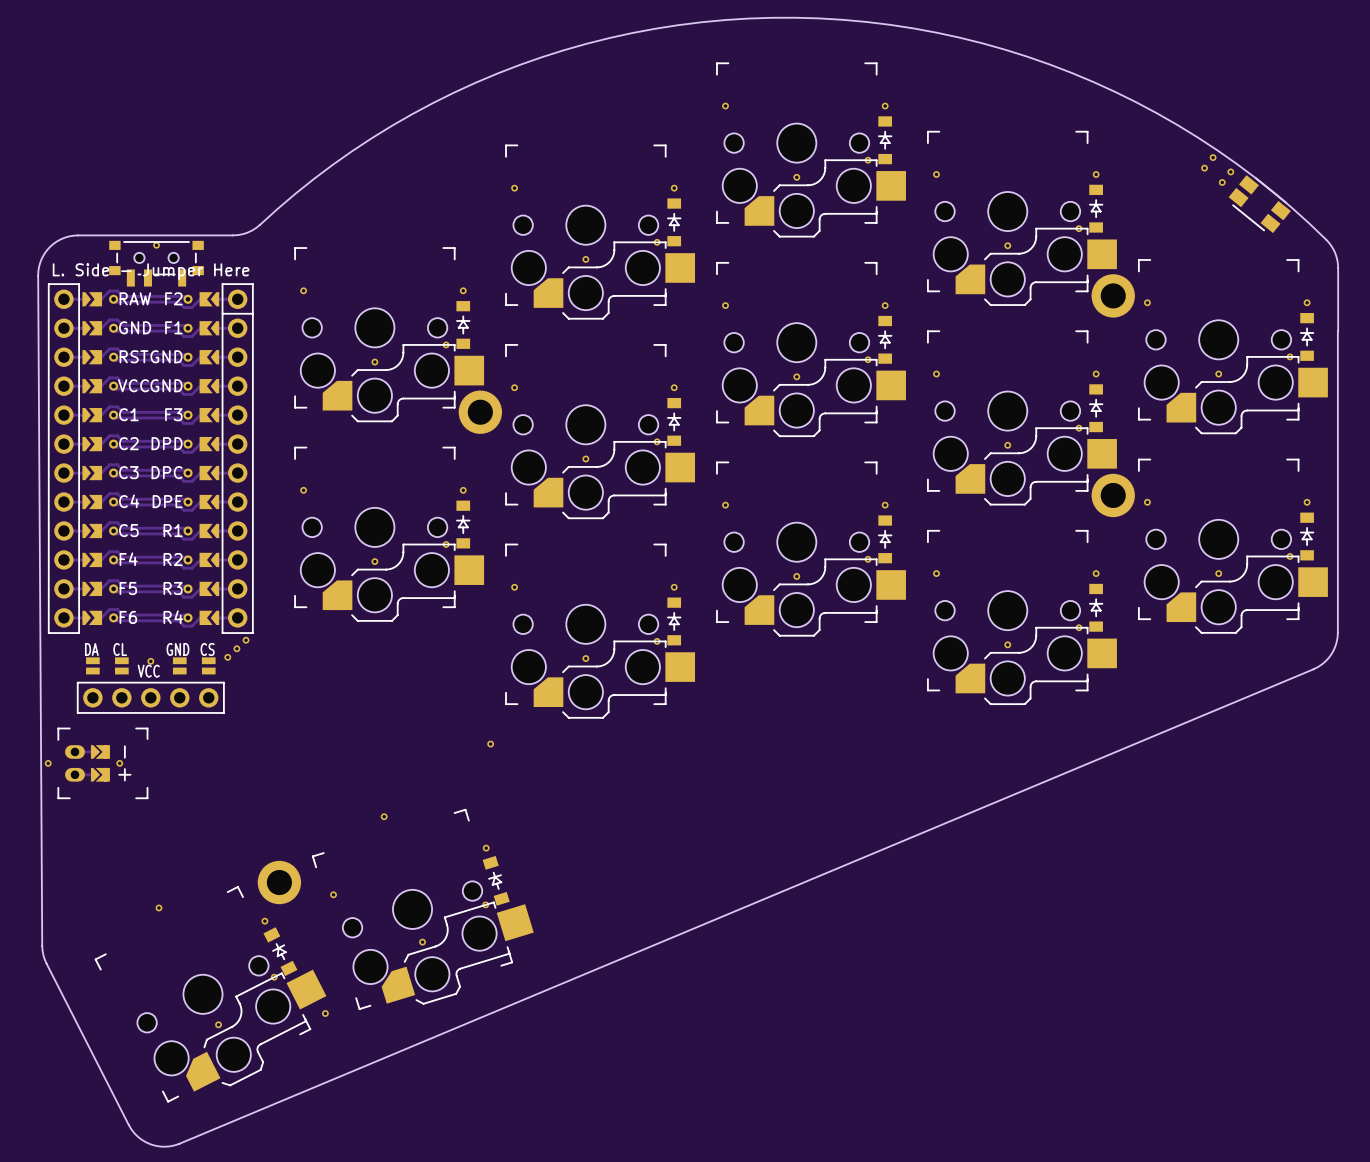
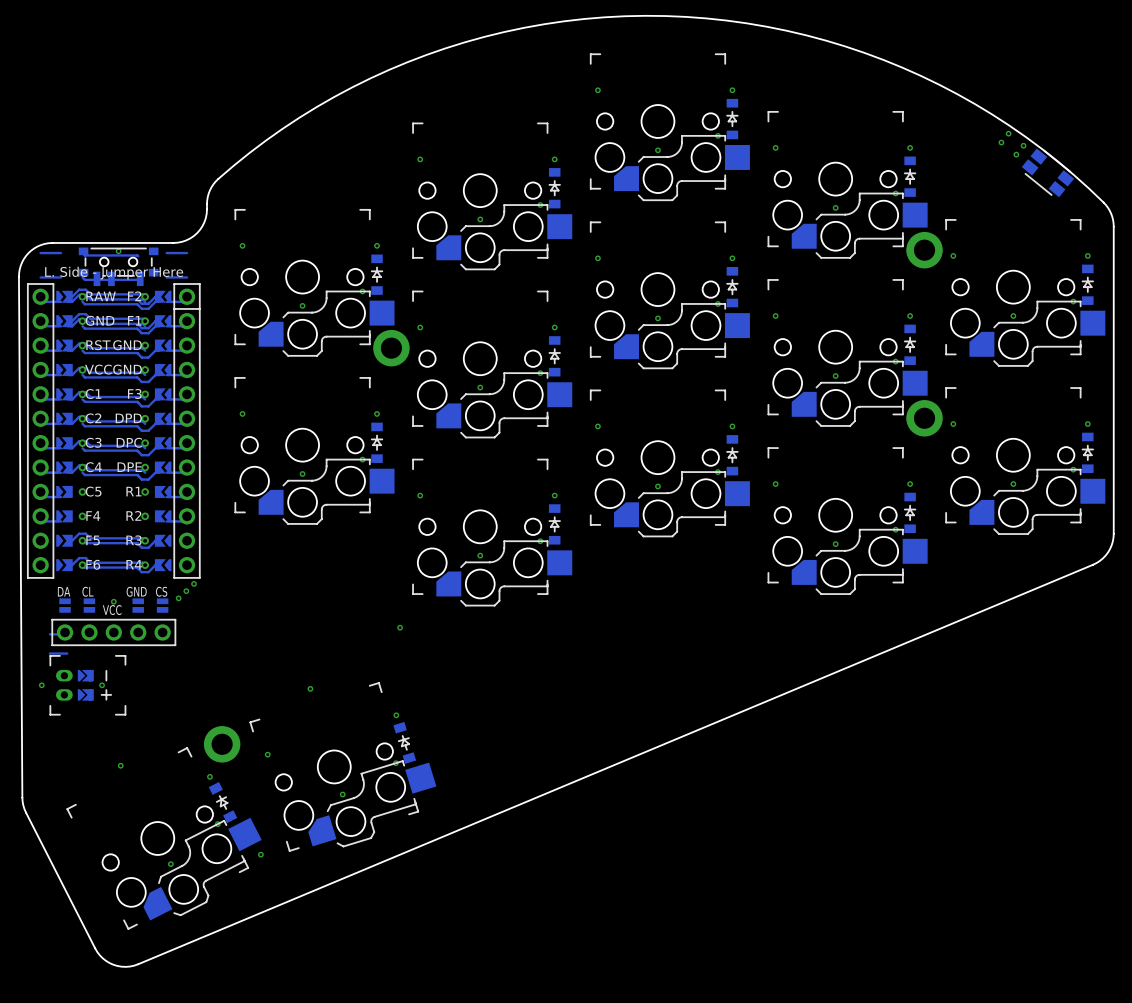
board edge: (78, 235) (64, 237) (49, 247) (42, 258) (38, 271) (42, 945) -> none
board edge: (232, 235) (247, 232) (256, 227) (314, 178) (391, 125) (454, 92) (519, 65) (586, 43) (678, 25) (749, 18) (843, 19) (936, 32) (1027, 56) (1115, 91) (1197, 137) (1273, 192) (1331, 245) (1337, 264) (1337, 331) -> (22, 797) (18, 276) (22, 262) (34, 248) (48, 243) (173, 242) (190, 238) (200, 229) (204, 222) (208, 193) (218, 178) (249, 152) (299, 117) (370, 78) (426, 54) (484, 36) (544, 24) (604, 17) (665, 16) (726, 20) (766, 26) (825, 40) (902, 67) (957, 94) (1009, 125) (1058, 161) (1103, 202) (1111, 213) (1113, 226) (1113, 279)
board edge: (232, 235) (78, 235) -> none
part position: (156, 245) -> (118, 251)
part position: (156, 263) -> (118, 266)
track: (187, 299) (185, 296) (122, 296) (117, 291) (109, 291) (101, 299) (96, 299) -> (145, 296) (142, 294) (90, 294) (85, 289) (79, 289) (72, 296) (67, 296)
track: (205, 299) (200, 299) (191, 307) (184, 307) (179, 303) -> (159, 296) (155, 296) (148, 303) (141, 303) (138, 300)
track: (187, 328) (185, 325) (122, 325) (117, 319) (109, 319) (101, 328) (96, 328) -> (145, 321) (142, 318) (90, 318) (85, 314) (79, 314) (72, 321) (67, 321)
track: (205, 328) (200, 328) (191, 336) (184, 336) (179, 332) -> (159, 321) (155, 321) (148, 328) (141, 328) (138, 324)
part position: (150, 458) -> (113, 430)
track: (113, 588) (116, 591) (179, 592) -> (82, 540) (84, 543) (138, 544)
track: (187, 588) (185, 586) (122, 586) (117, 580) (109, 580) (101, 588) (96, 588) -> (145, 540) (142, 538) (90, 538) (85, 533) (79, 533) (72, 540) (67, 540)
track: (205, 588) (200, 588) (191, 597) (184, 597) (179, 592) -> (159, 540) (155, 540) (148, 547) (141, 547) (138, 544)
track: (113, 617) (116, 620) (179, 621) -> (82, 565) (84, 567) (138, 568)
track: (187, 617) (185, 615) (122, 615) (117, 609) (109, 609) (101, 617) (96, 617) -> (145, 565) (142, 562) (90, 562) (85, 558) (79, 558) (72, 565) (67, 565)
track: (205, 617) (200, 617) (191, 626) (184, 626) (179, 621) -> (159, 565) (155, 565) (148, 572) (141, 572) (138, 568)
part: (246, 640) -> none
part: (236, 648) -> none
part: (227, 657) -> none
part: (150, 661) -> none
part position: (150, 685) -> (113, 622)
part: none -> (194, 583)
part: none -> (186, 591)
part: none -> (178, 598)
part: none -> (113, 601)
part: (48, 763) -> none
part position: (102, 763) -> (87, 685)
part: (119, 763) -> none
part: none -> (41, 685)
part: none -> (102, 685)

